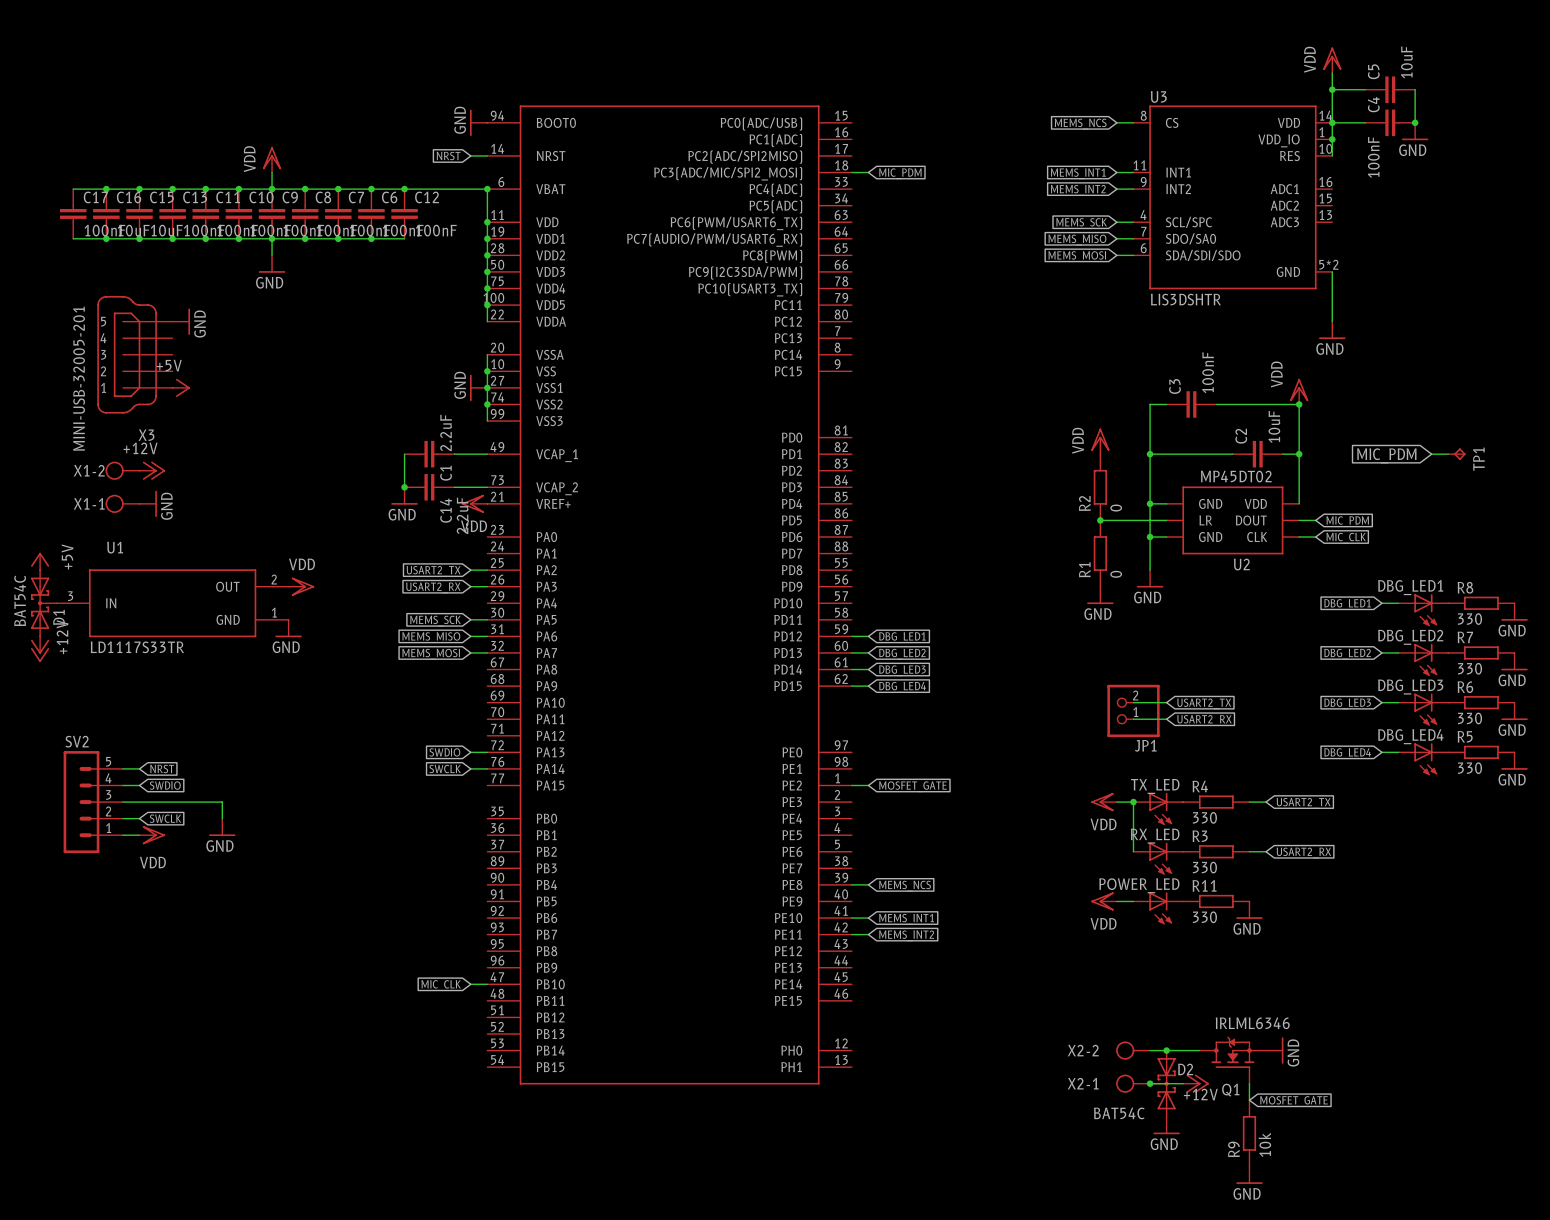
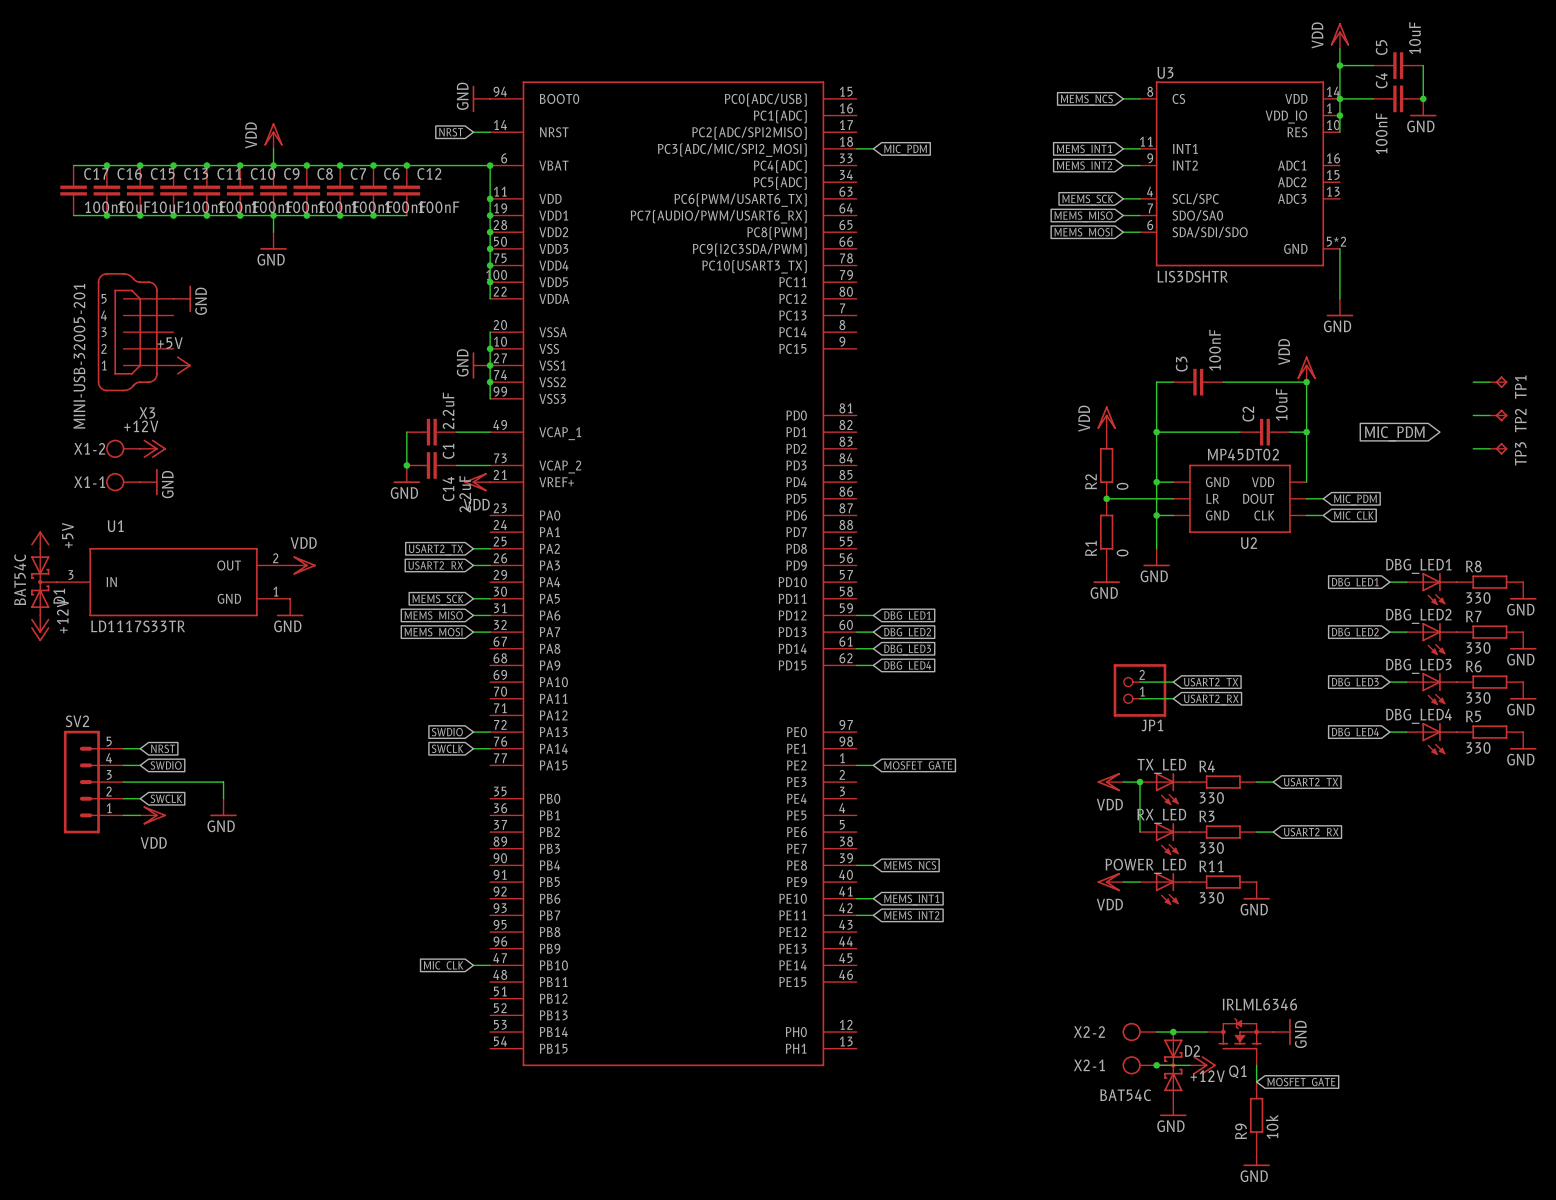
wire: none -> (1473, 382) (1489, 382)
wire: none -> (1473, 415) (1489, 415)
TP2: none -> (1498, 415)
wire: (1431, 454) (1448, 454) -> (1473, 448) (1489, 448)
TP1 position: (1456, 454) -> (1498, 382)
TP3: none -> (1498, 448)

